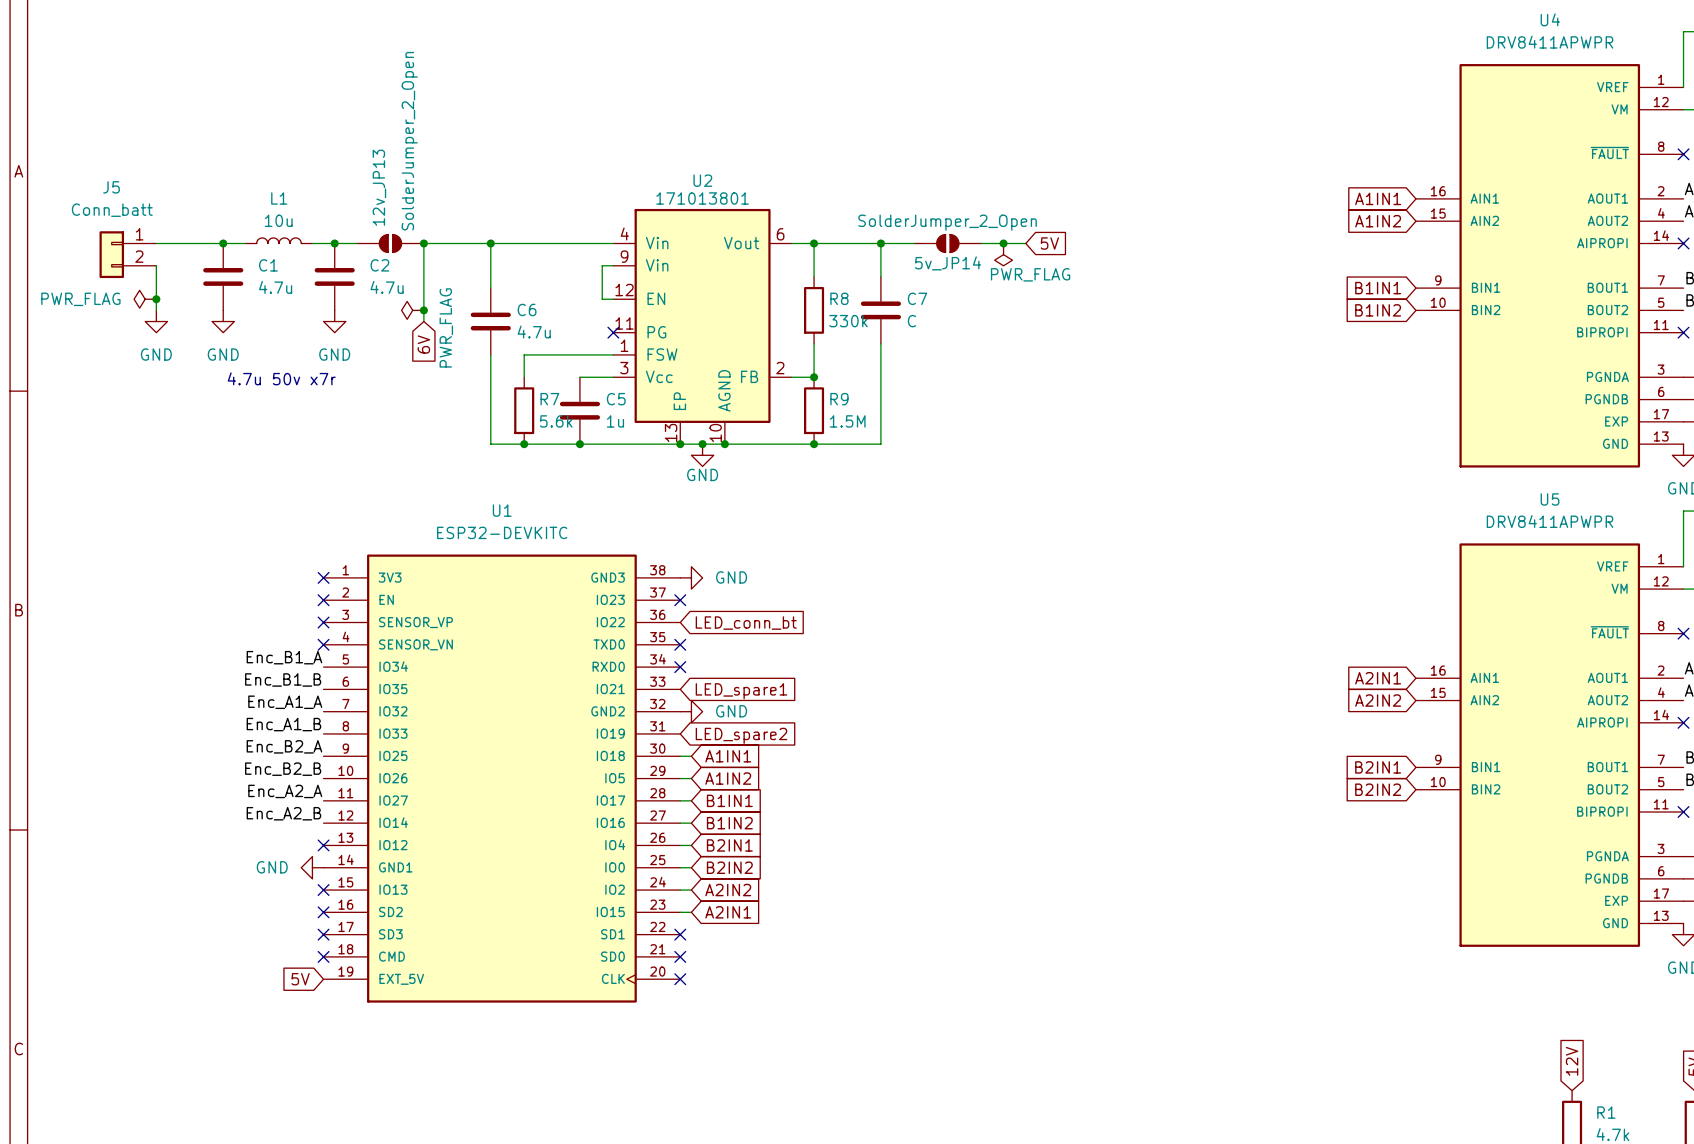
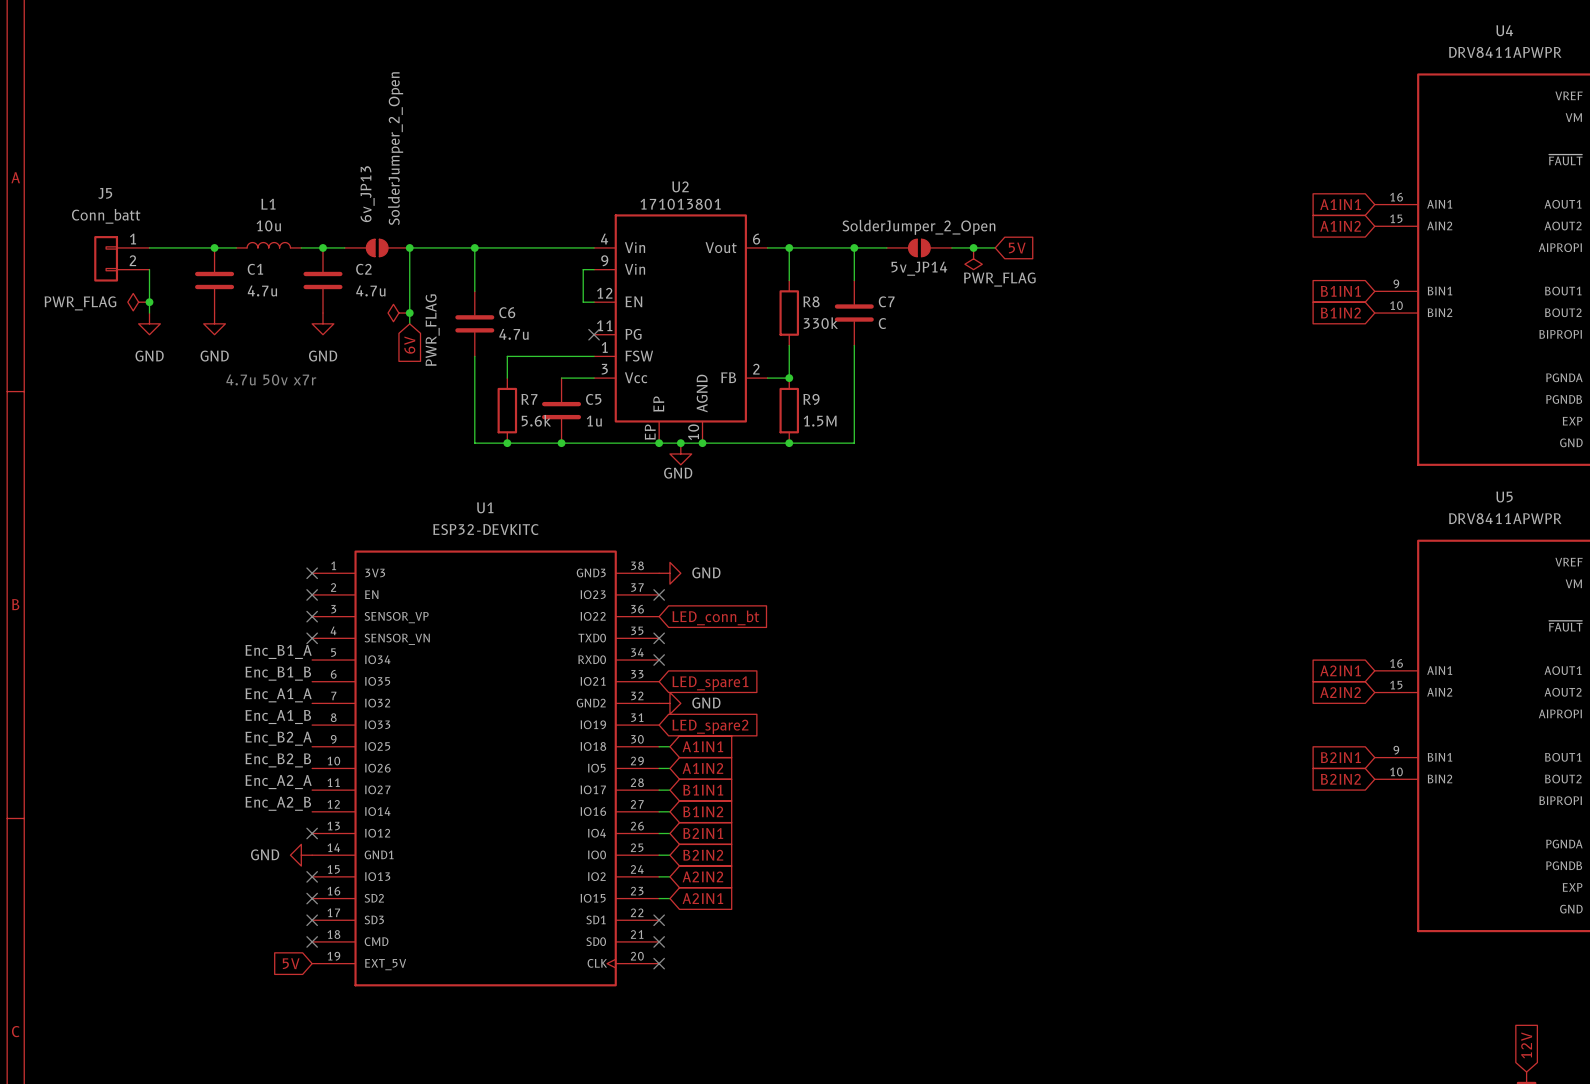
12v_JP13 name: 12v_JP13 (379, 187) -> 6v_JP13 (367, 194)
U2 pin number: 13 (671, 433) -> EP (650, 432)

